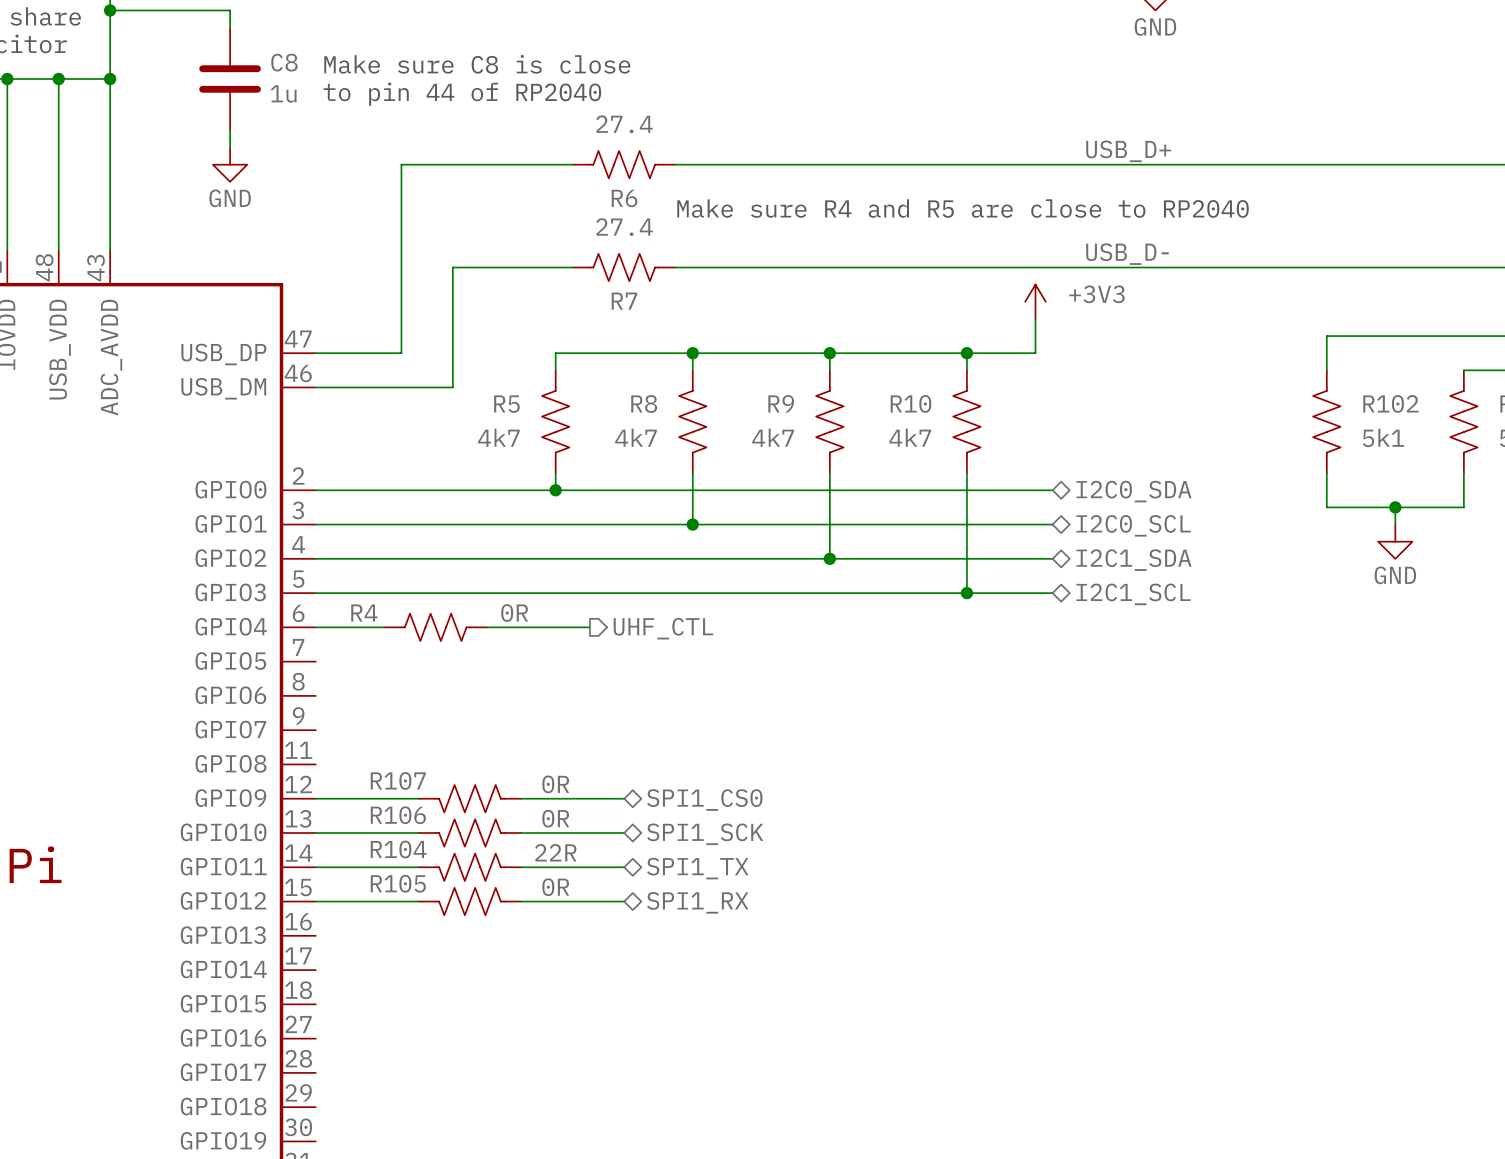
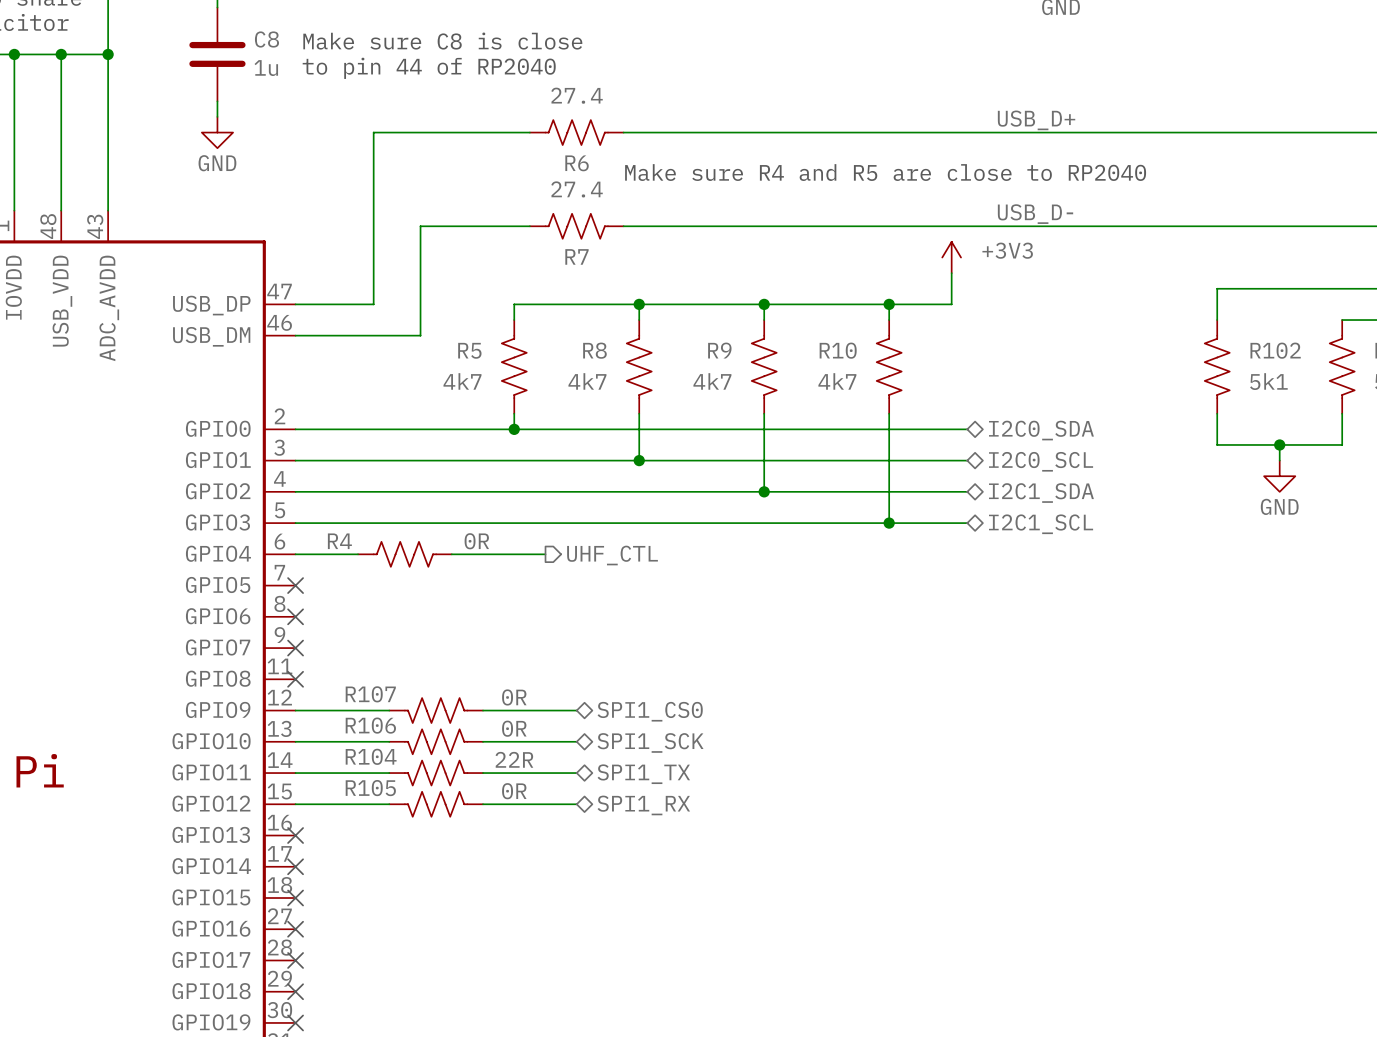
no-connect mark: none -> (295, 585)
no-connect mark: none -> (295, 616)
no-connect mark: none -> (295, 648)
no-connect mark: none -> (295, 679)
no-connect mark: none -> (295, 835)
no-connect mark: none -> (295, 866)
no-connect mark: none -> (295, 898)
no-connect mark: none -> (295, 929)
no-connect mark: none -> (295, 960)
no-connect mark: none -> (295, 991)
no-connect mark: none -> (295, 1022)

